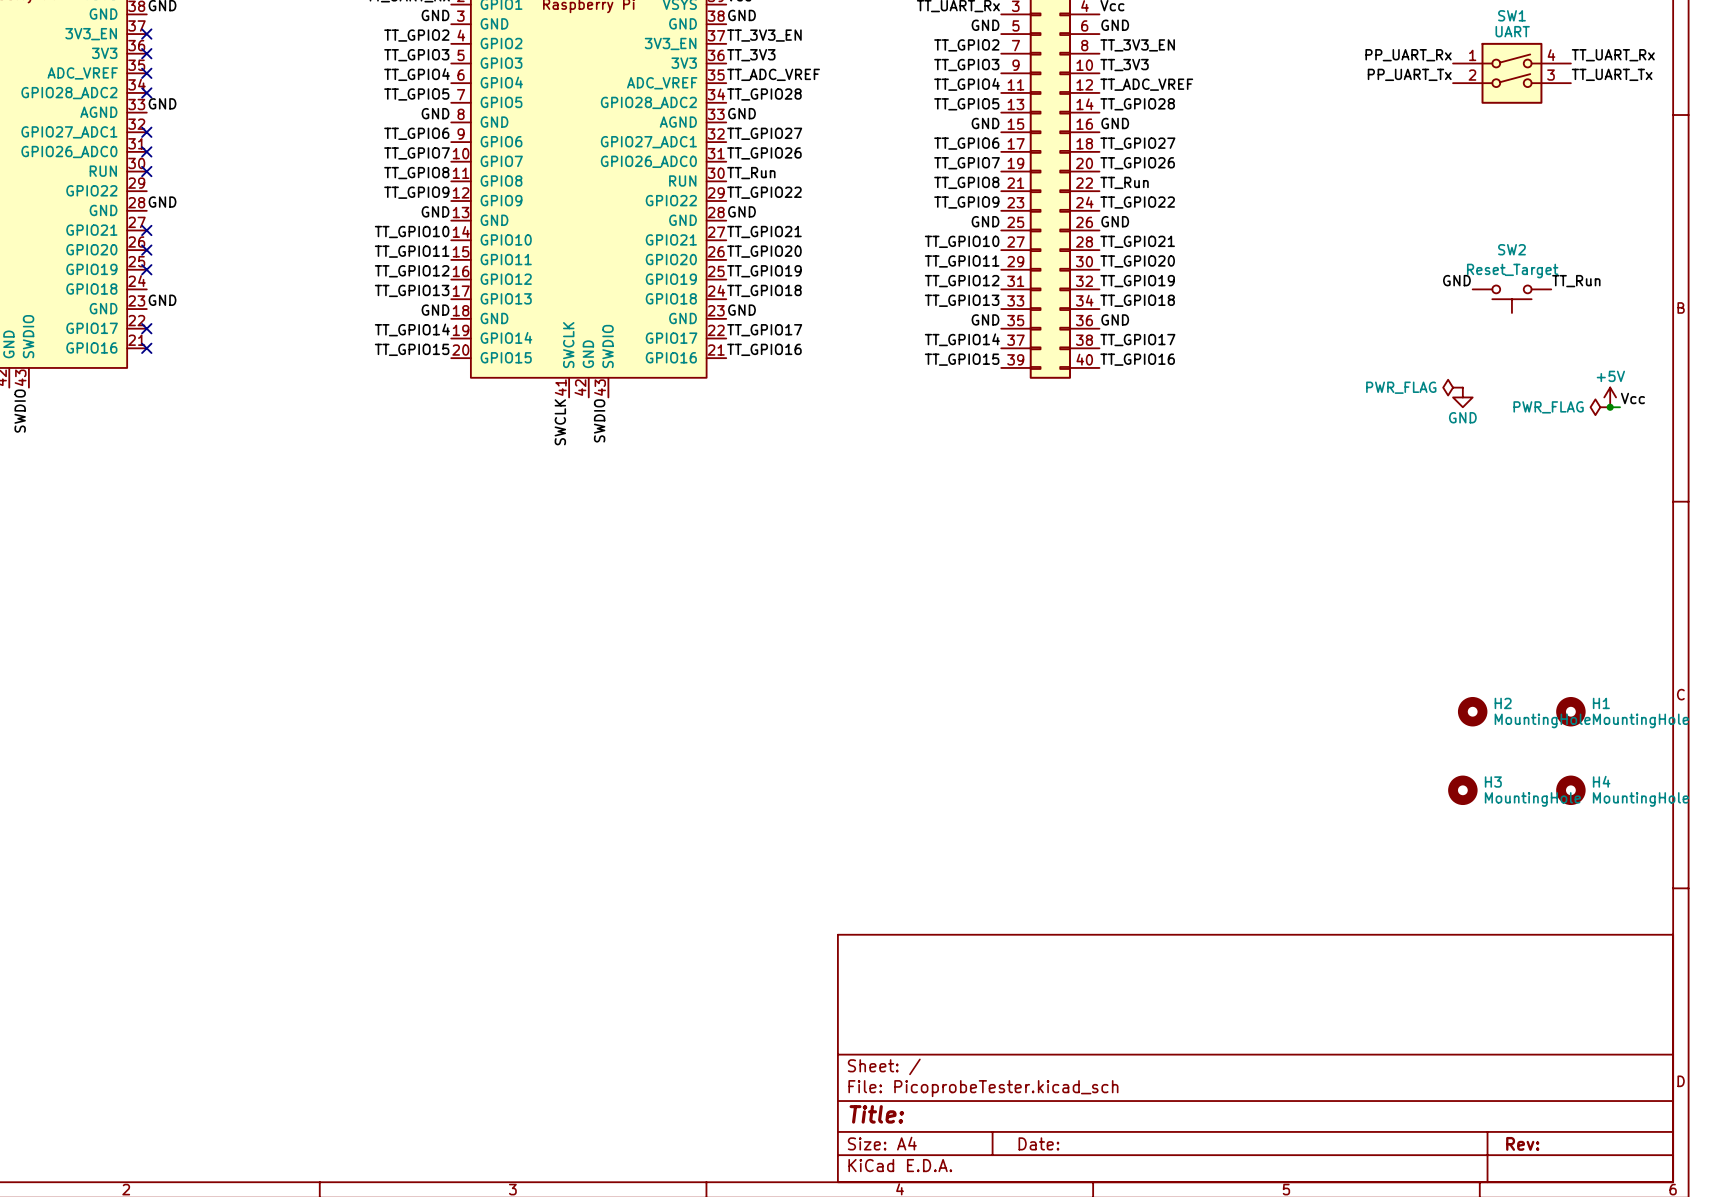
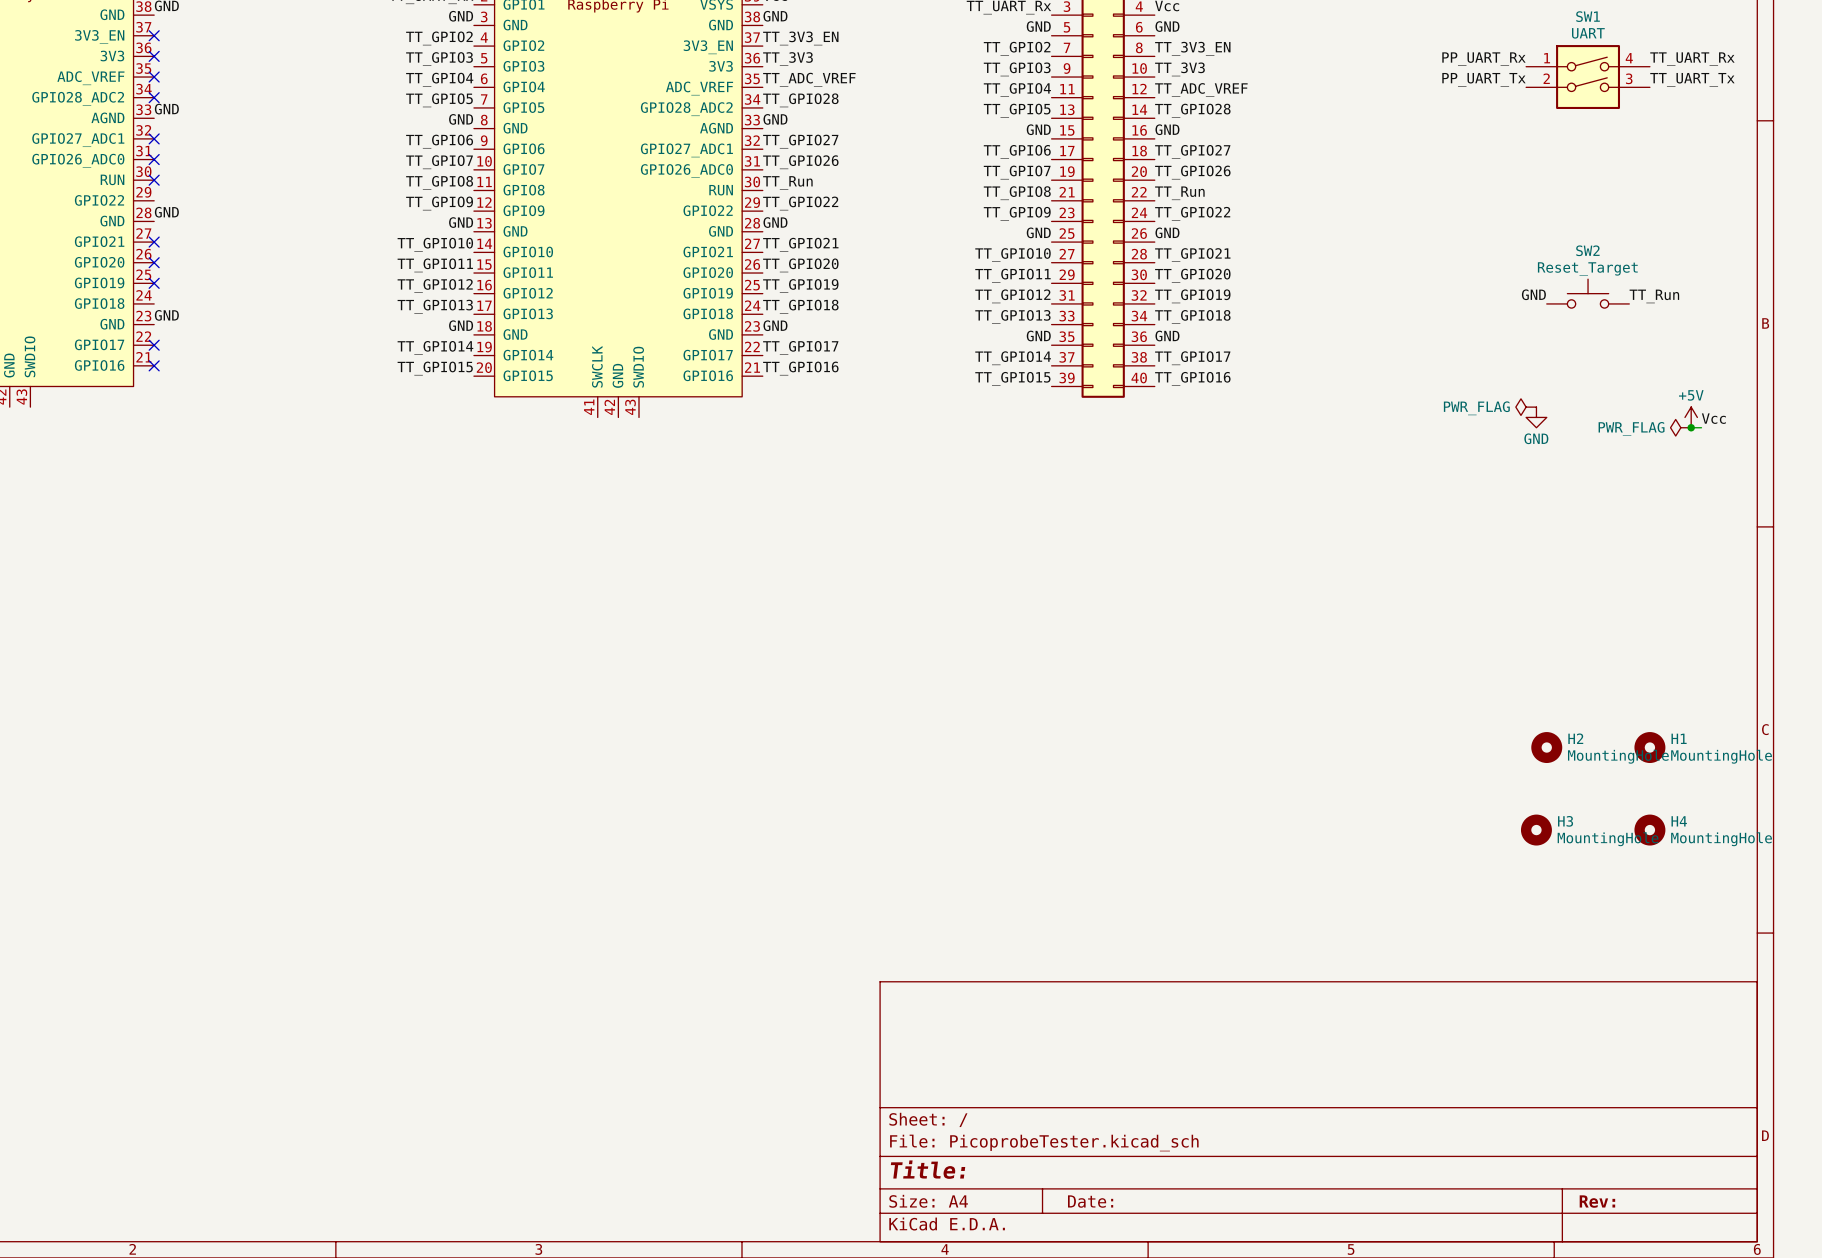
SW2 rotation: 0° (1511, 299) -> 180° (1588, 293)
label: SWDIO (20, 411) -> none
label: SWDIO (599, 420) -> none
label: SWCLK (560, 422) -> none

